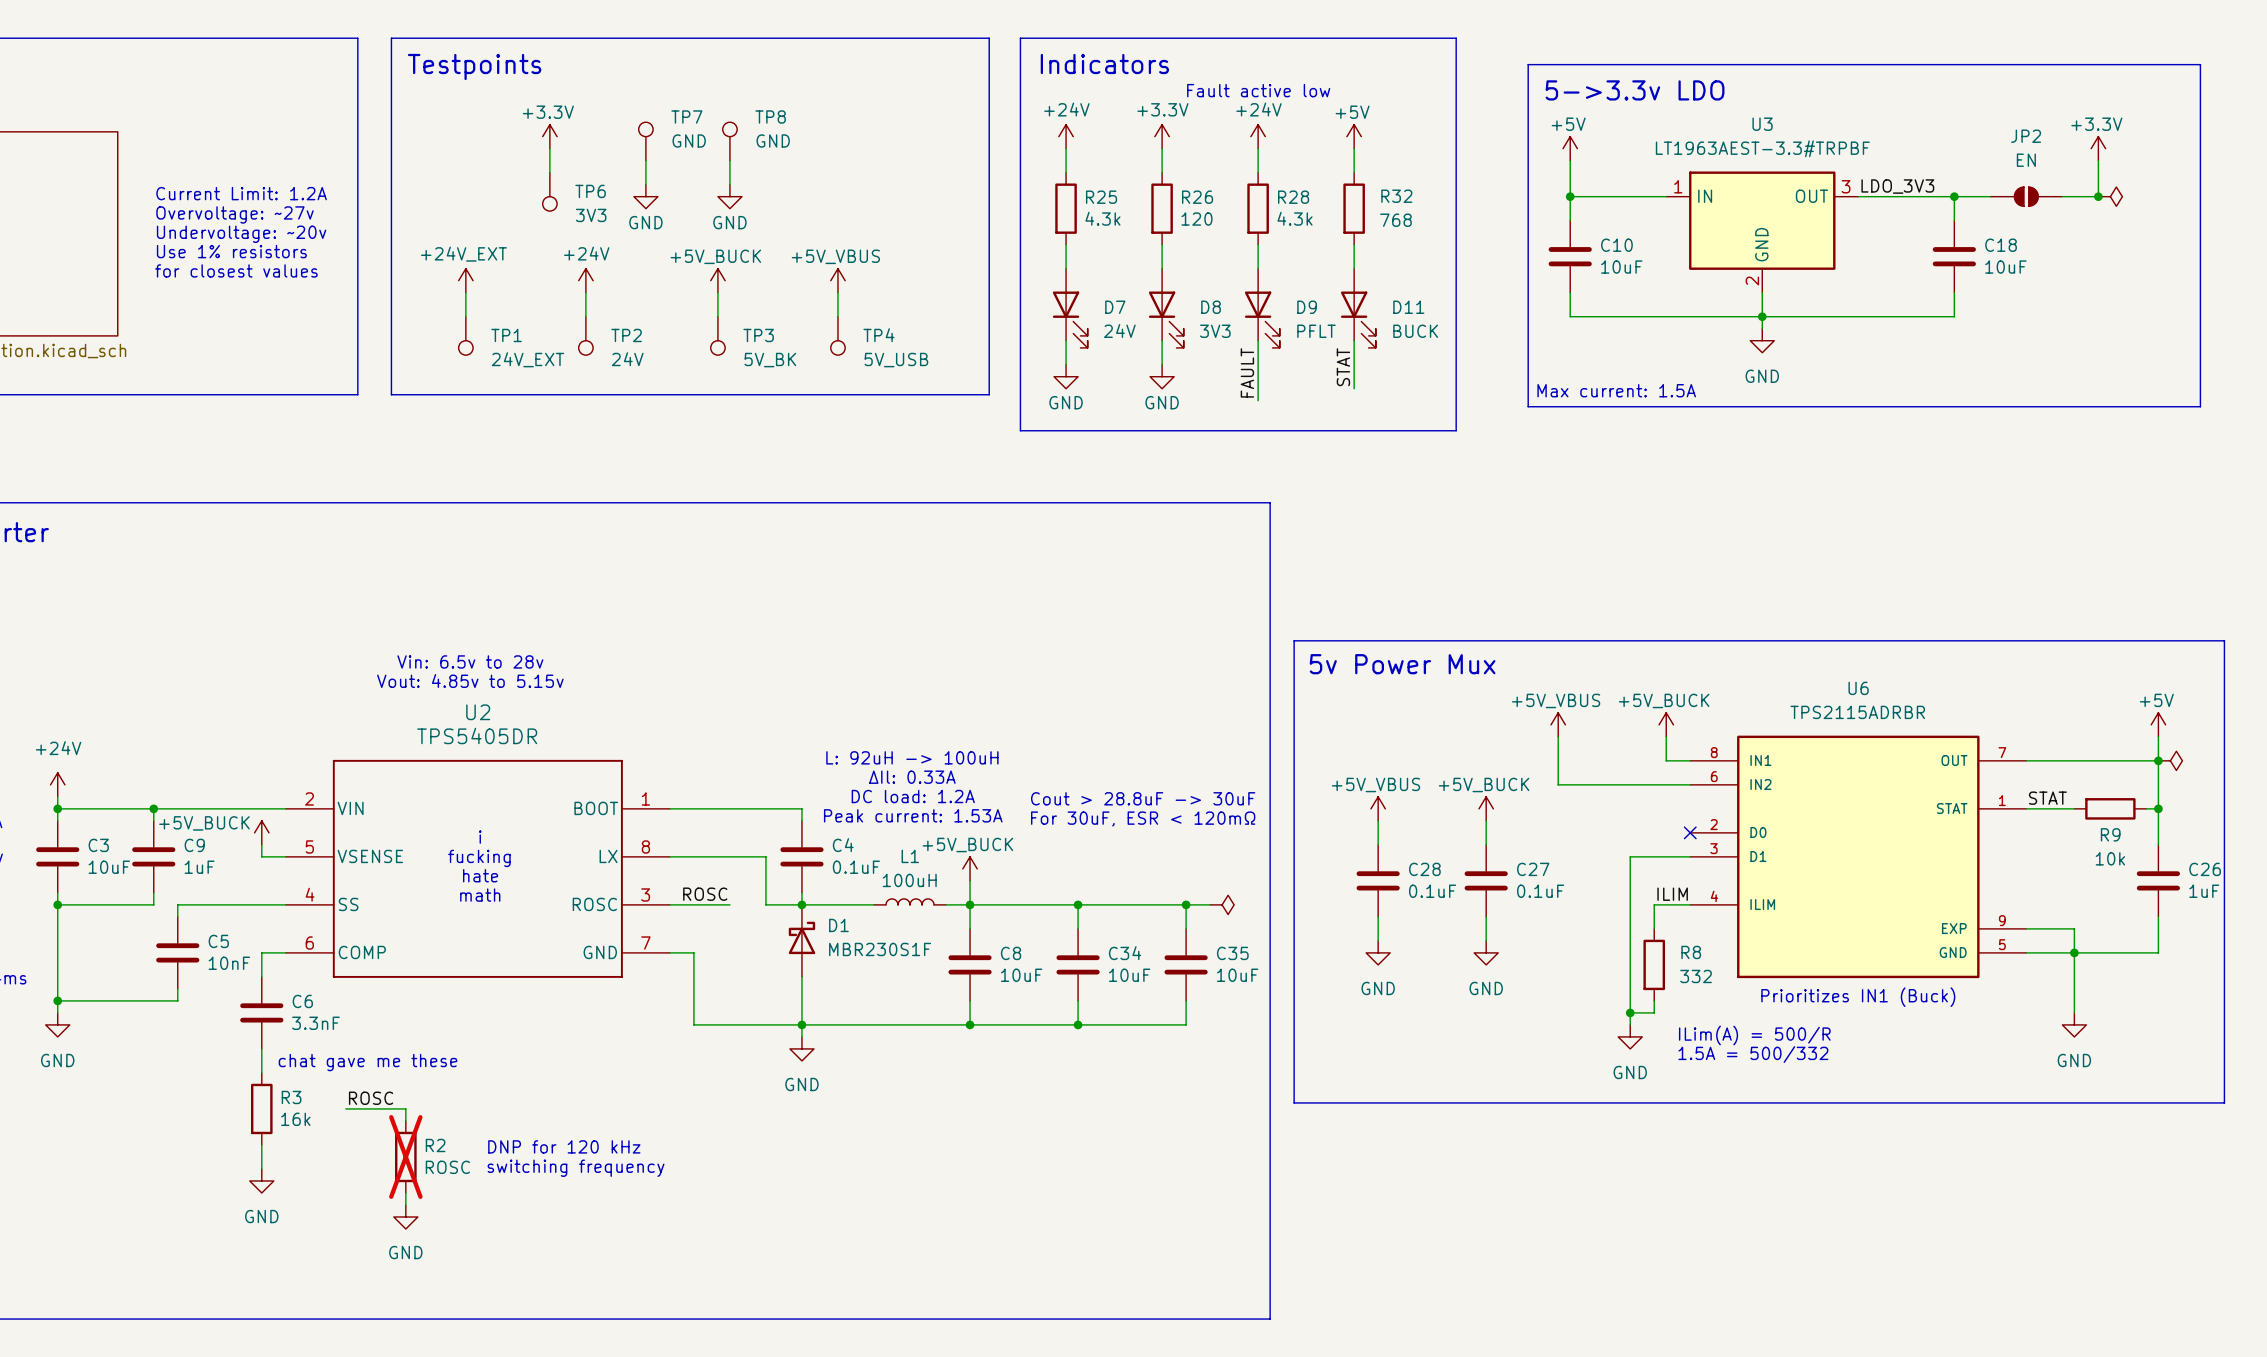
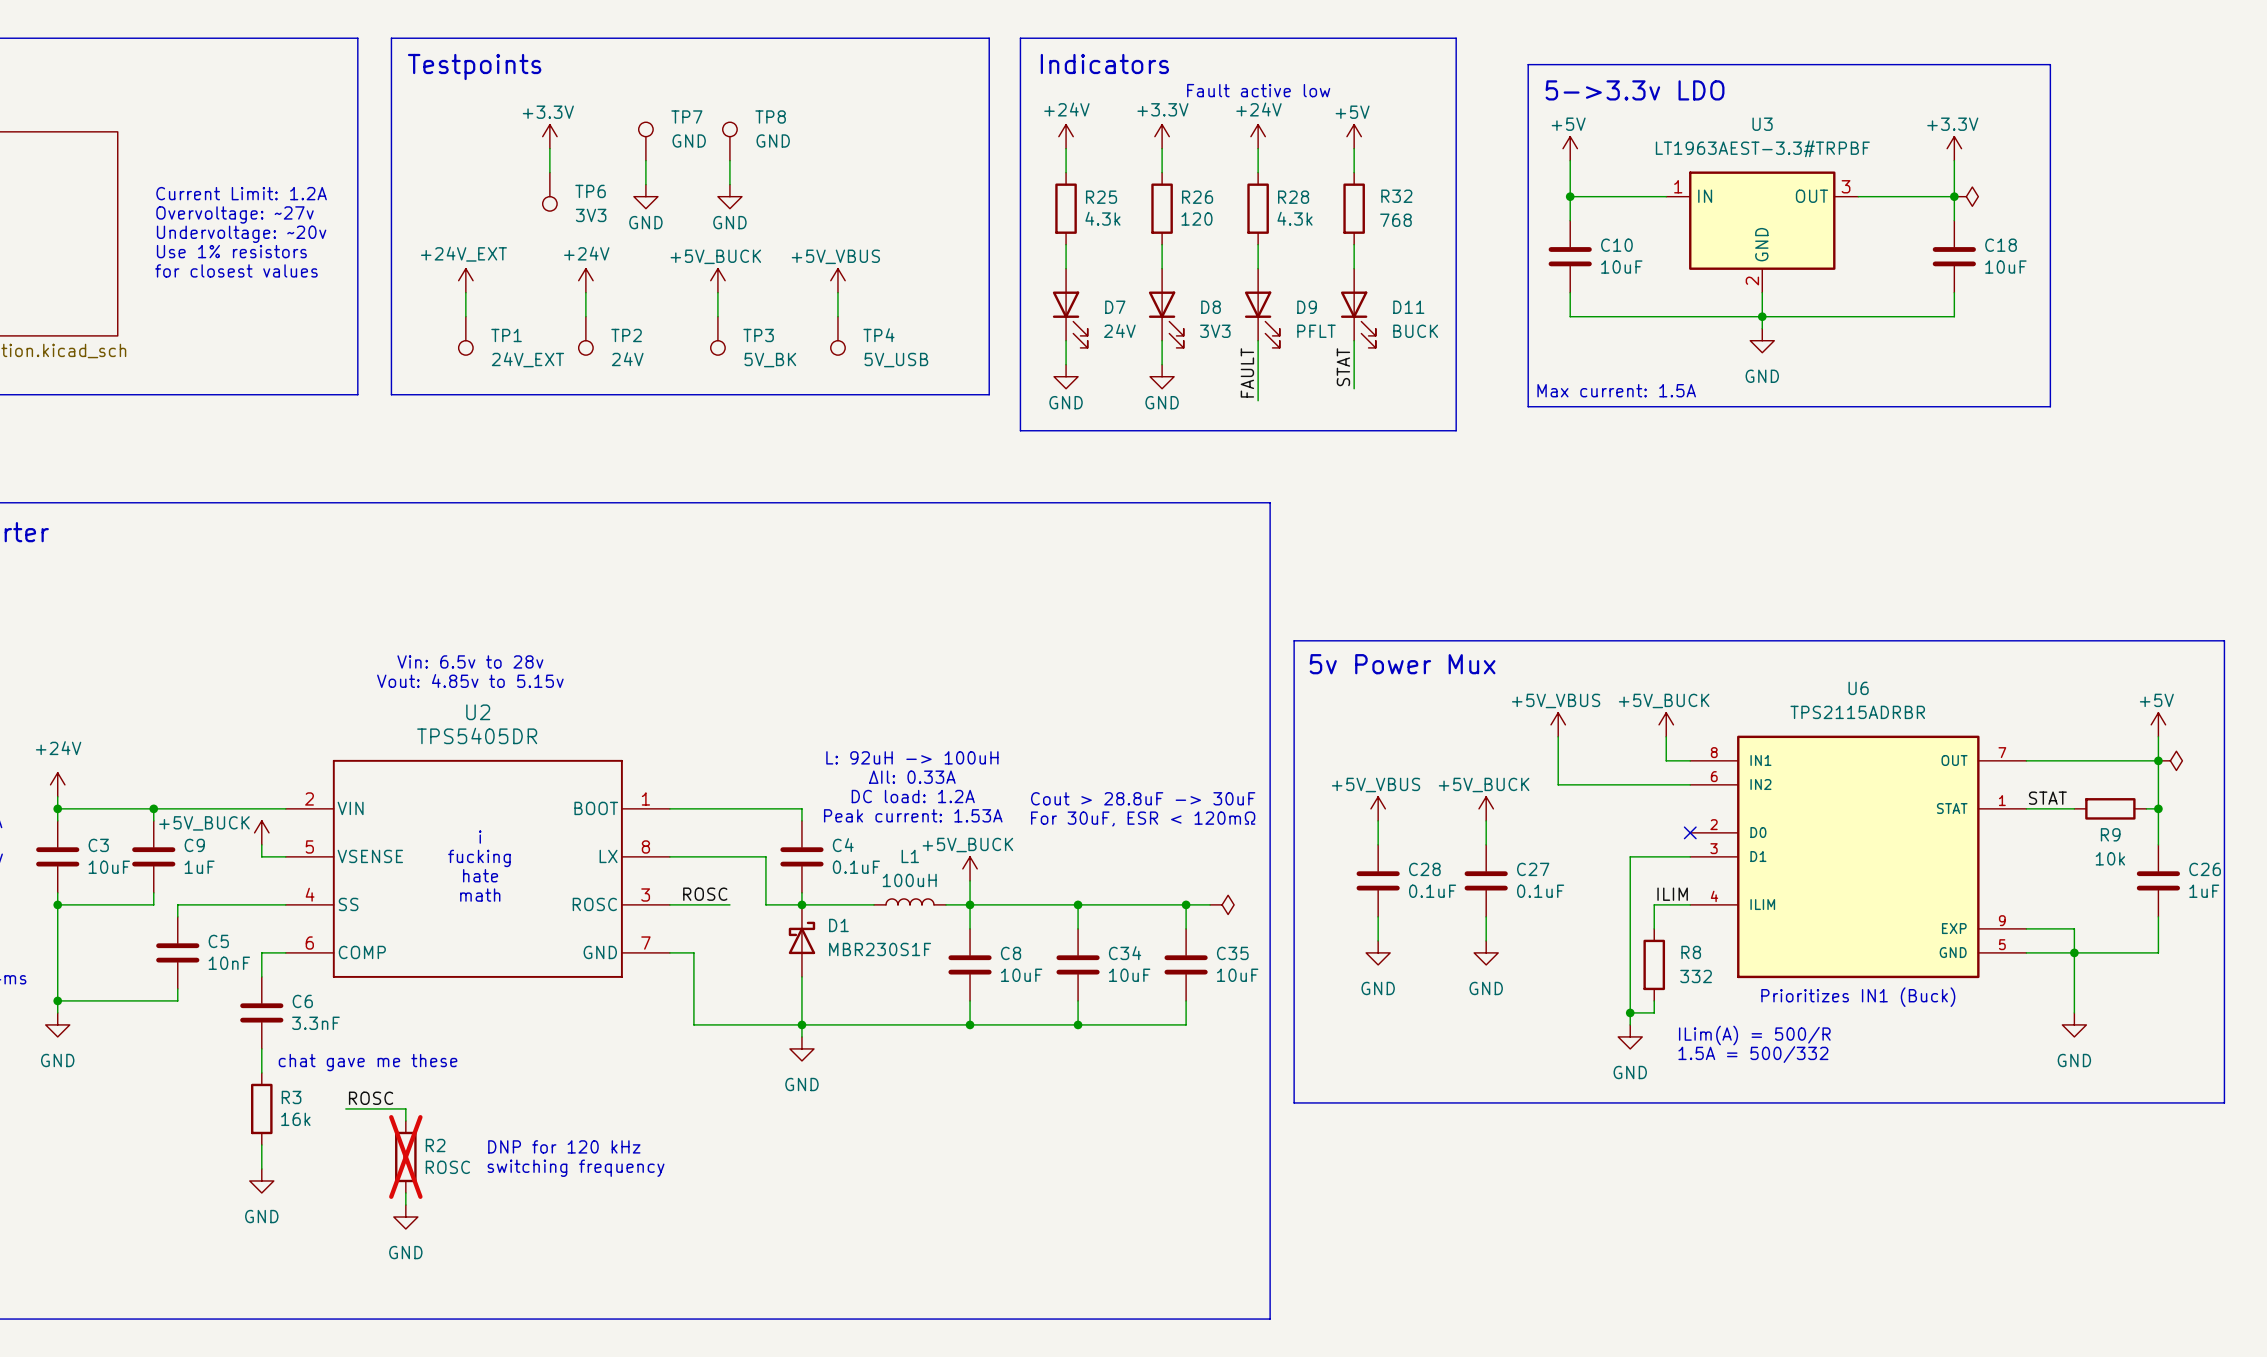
line: (2050, 64) (2200, 64) (2200, 406) (2050, 406) -> (2050, 64) (2050, 406)
power symbol position: +3.3V (2098, 148) -> +3.3V (1954, 148)
wire: (2098, 160) (2098, 196) (2062, 196) -> none
label: LDO_3V3 (1897, 186) -> none
wire: (1954, 196) (1990, 196) -> (1954, 196) (1954, 160)
JP2: EN (2026, 196) -> none
junction: (2098, 196) -> none
power symbol position: (2110, 196) -> (1966, 196)

